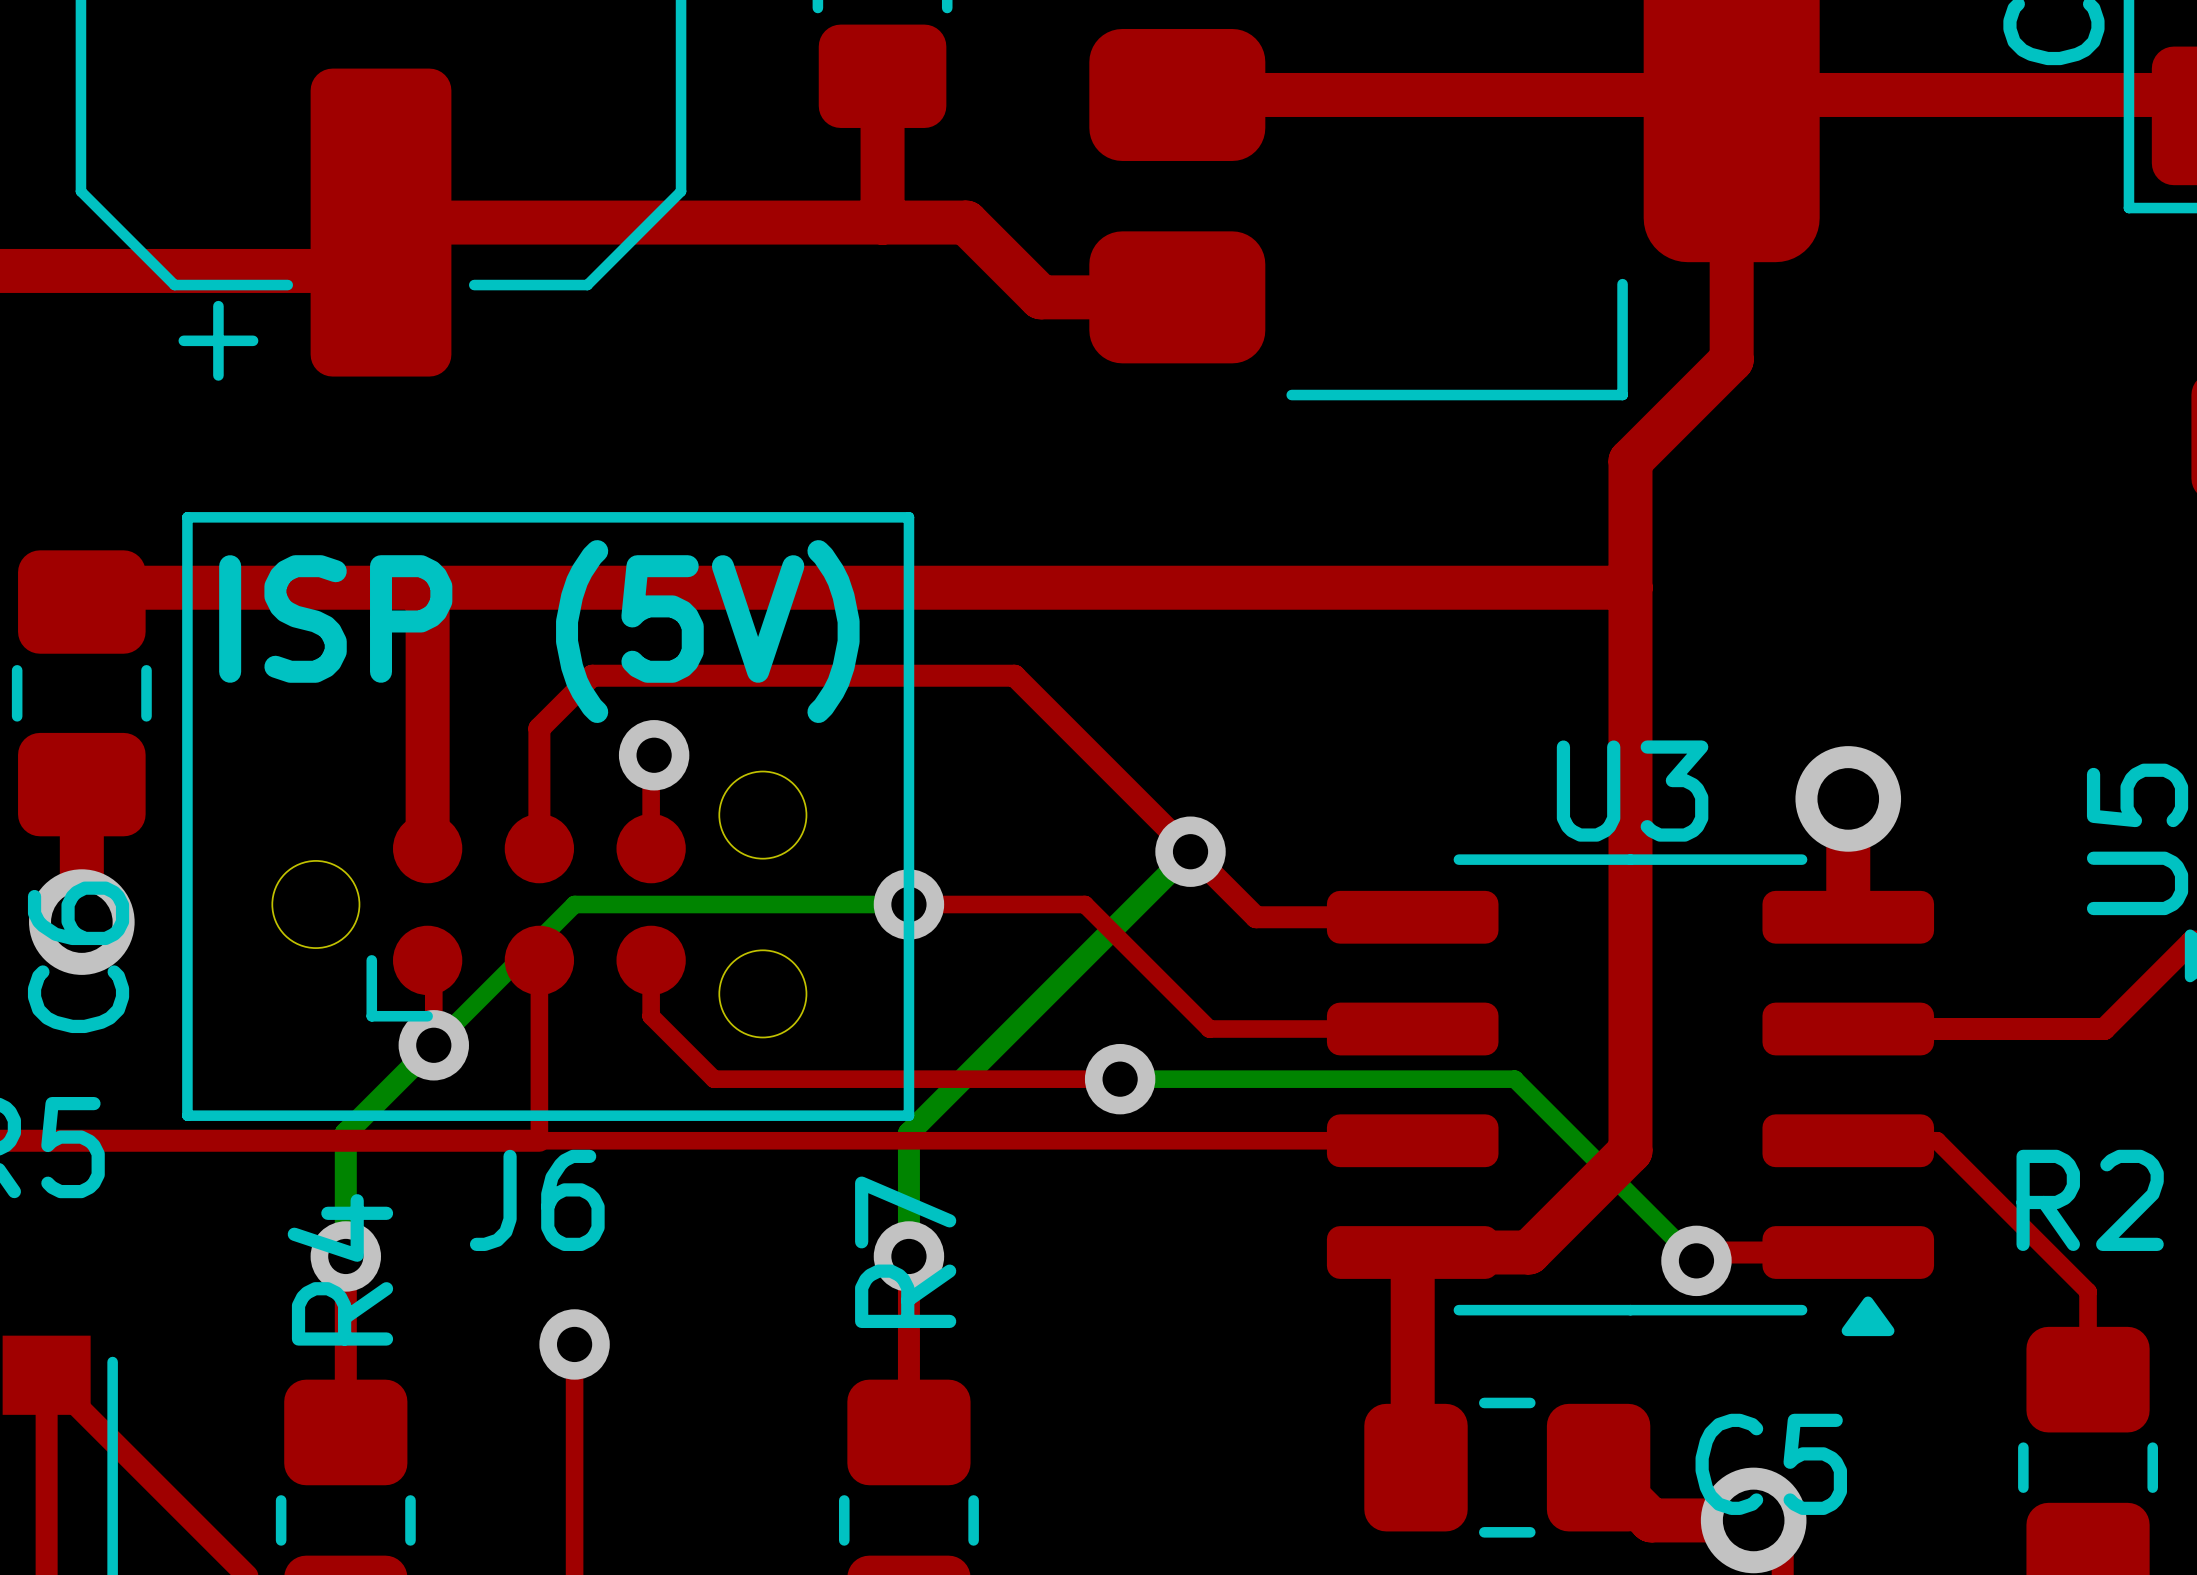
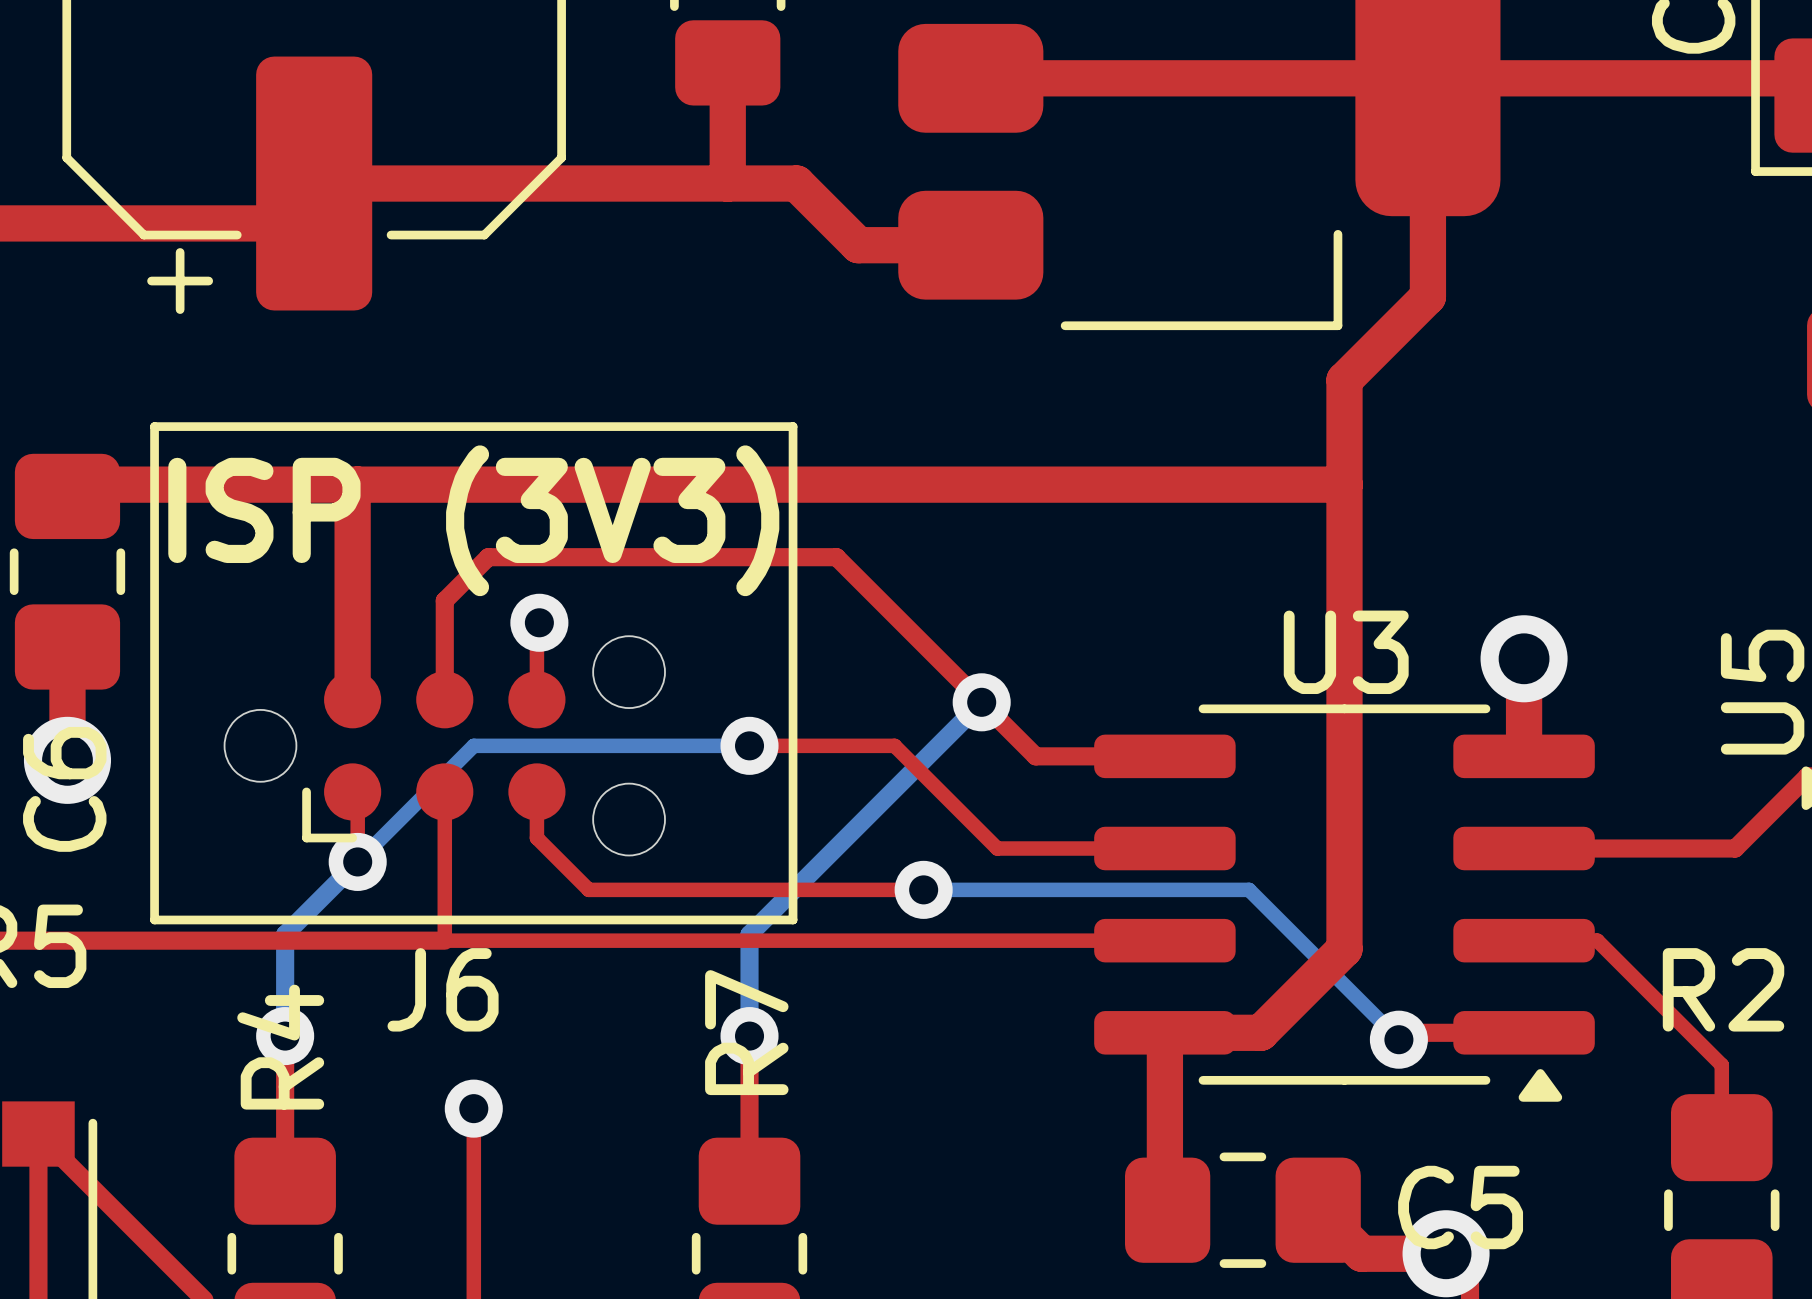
line: (908, 517) (908, 1115) -> (749, 426) (793, 426) (793, 919) (749, 919)
J6 value: ISP (5V) (539, 631) -> ISP (3V3) (473, 520)

